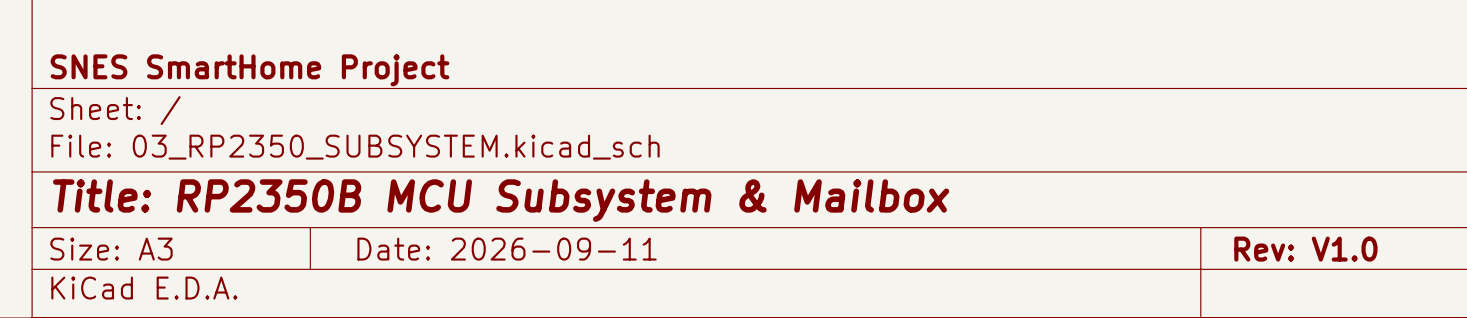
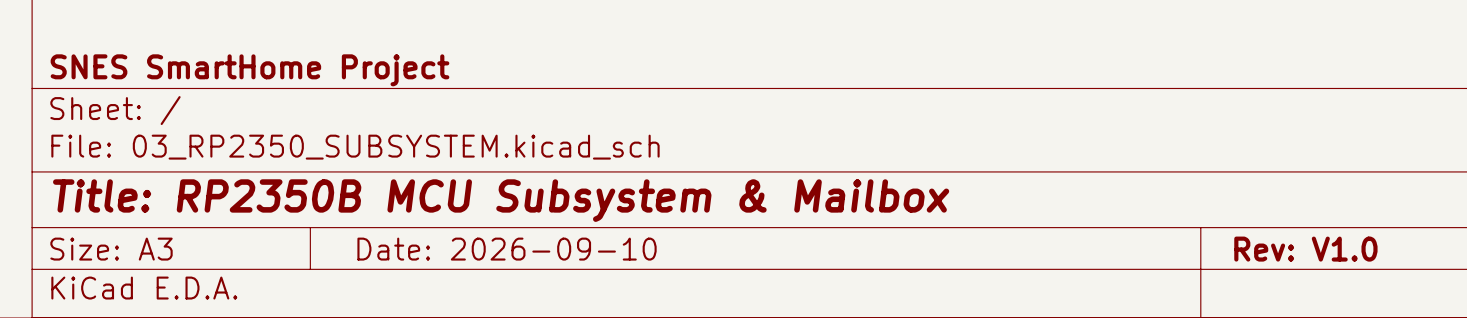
title block: Date: 2026-09-11 (507, 249) -> Date: 2026-09-10 (507, 249)

